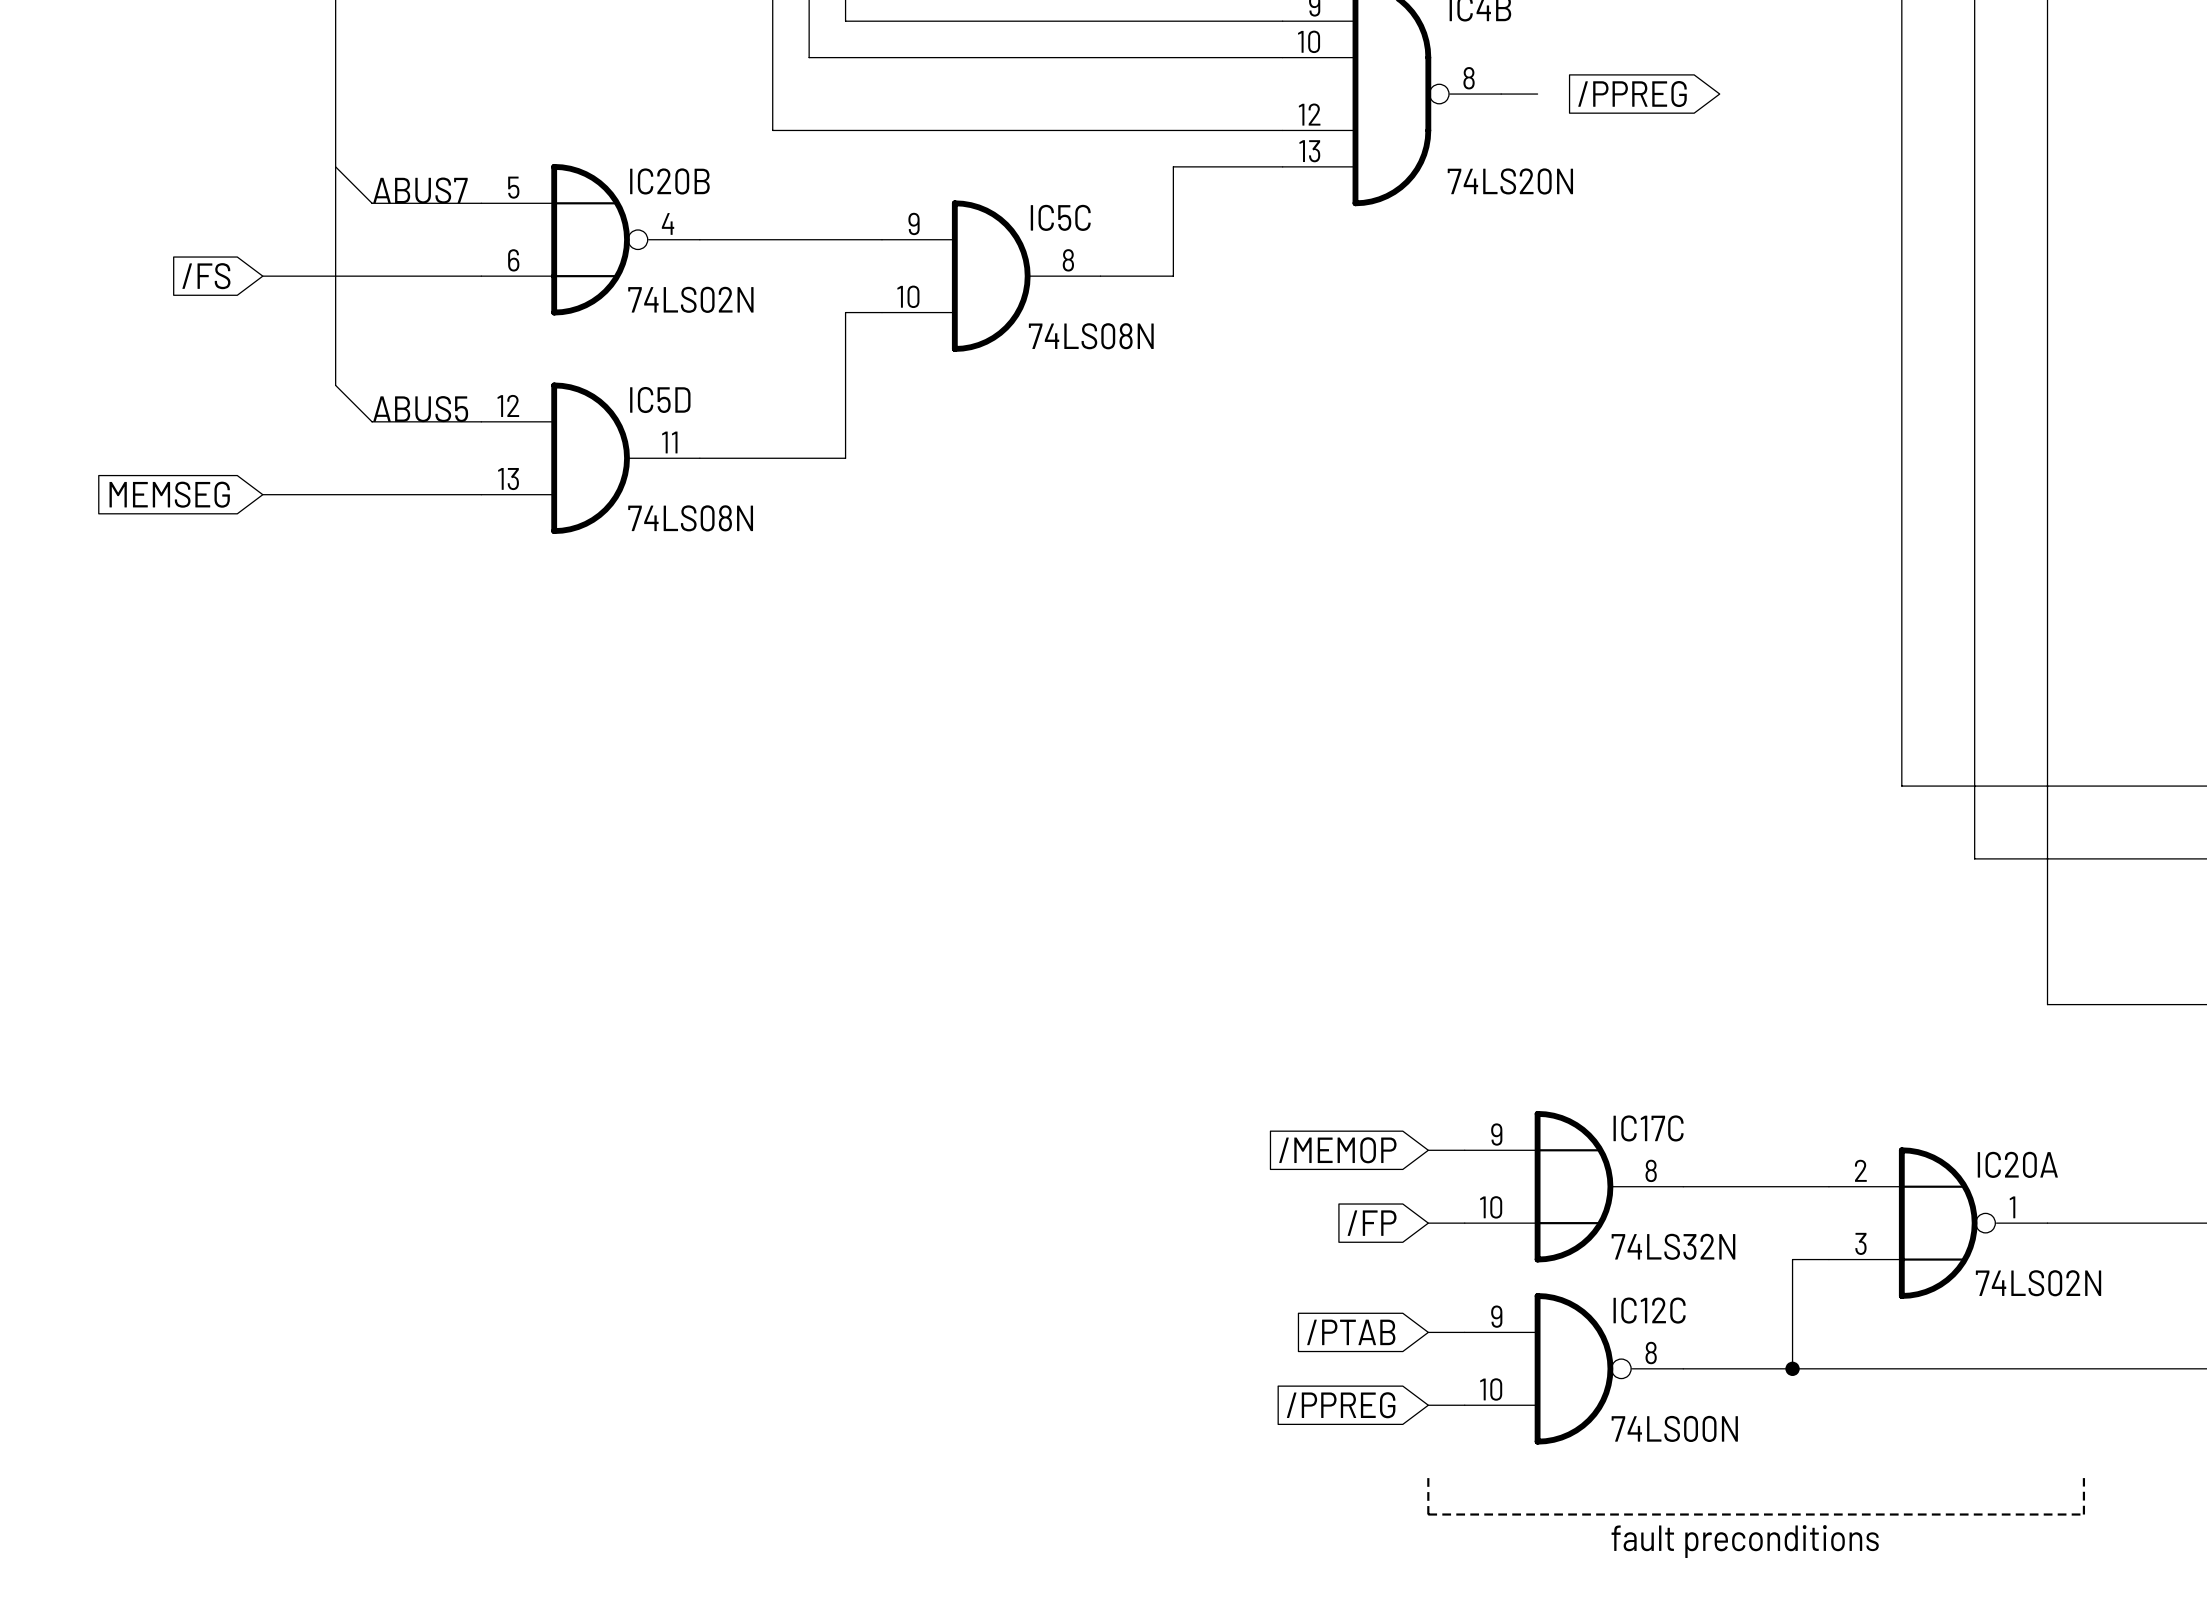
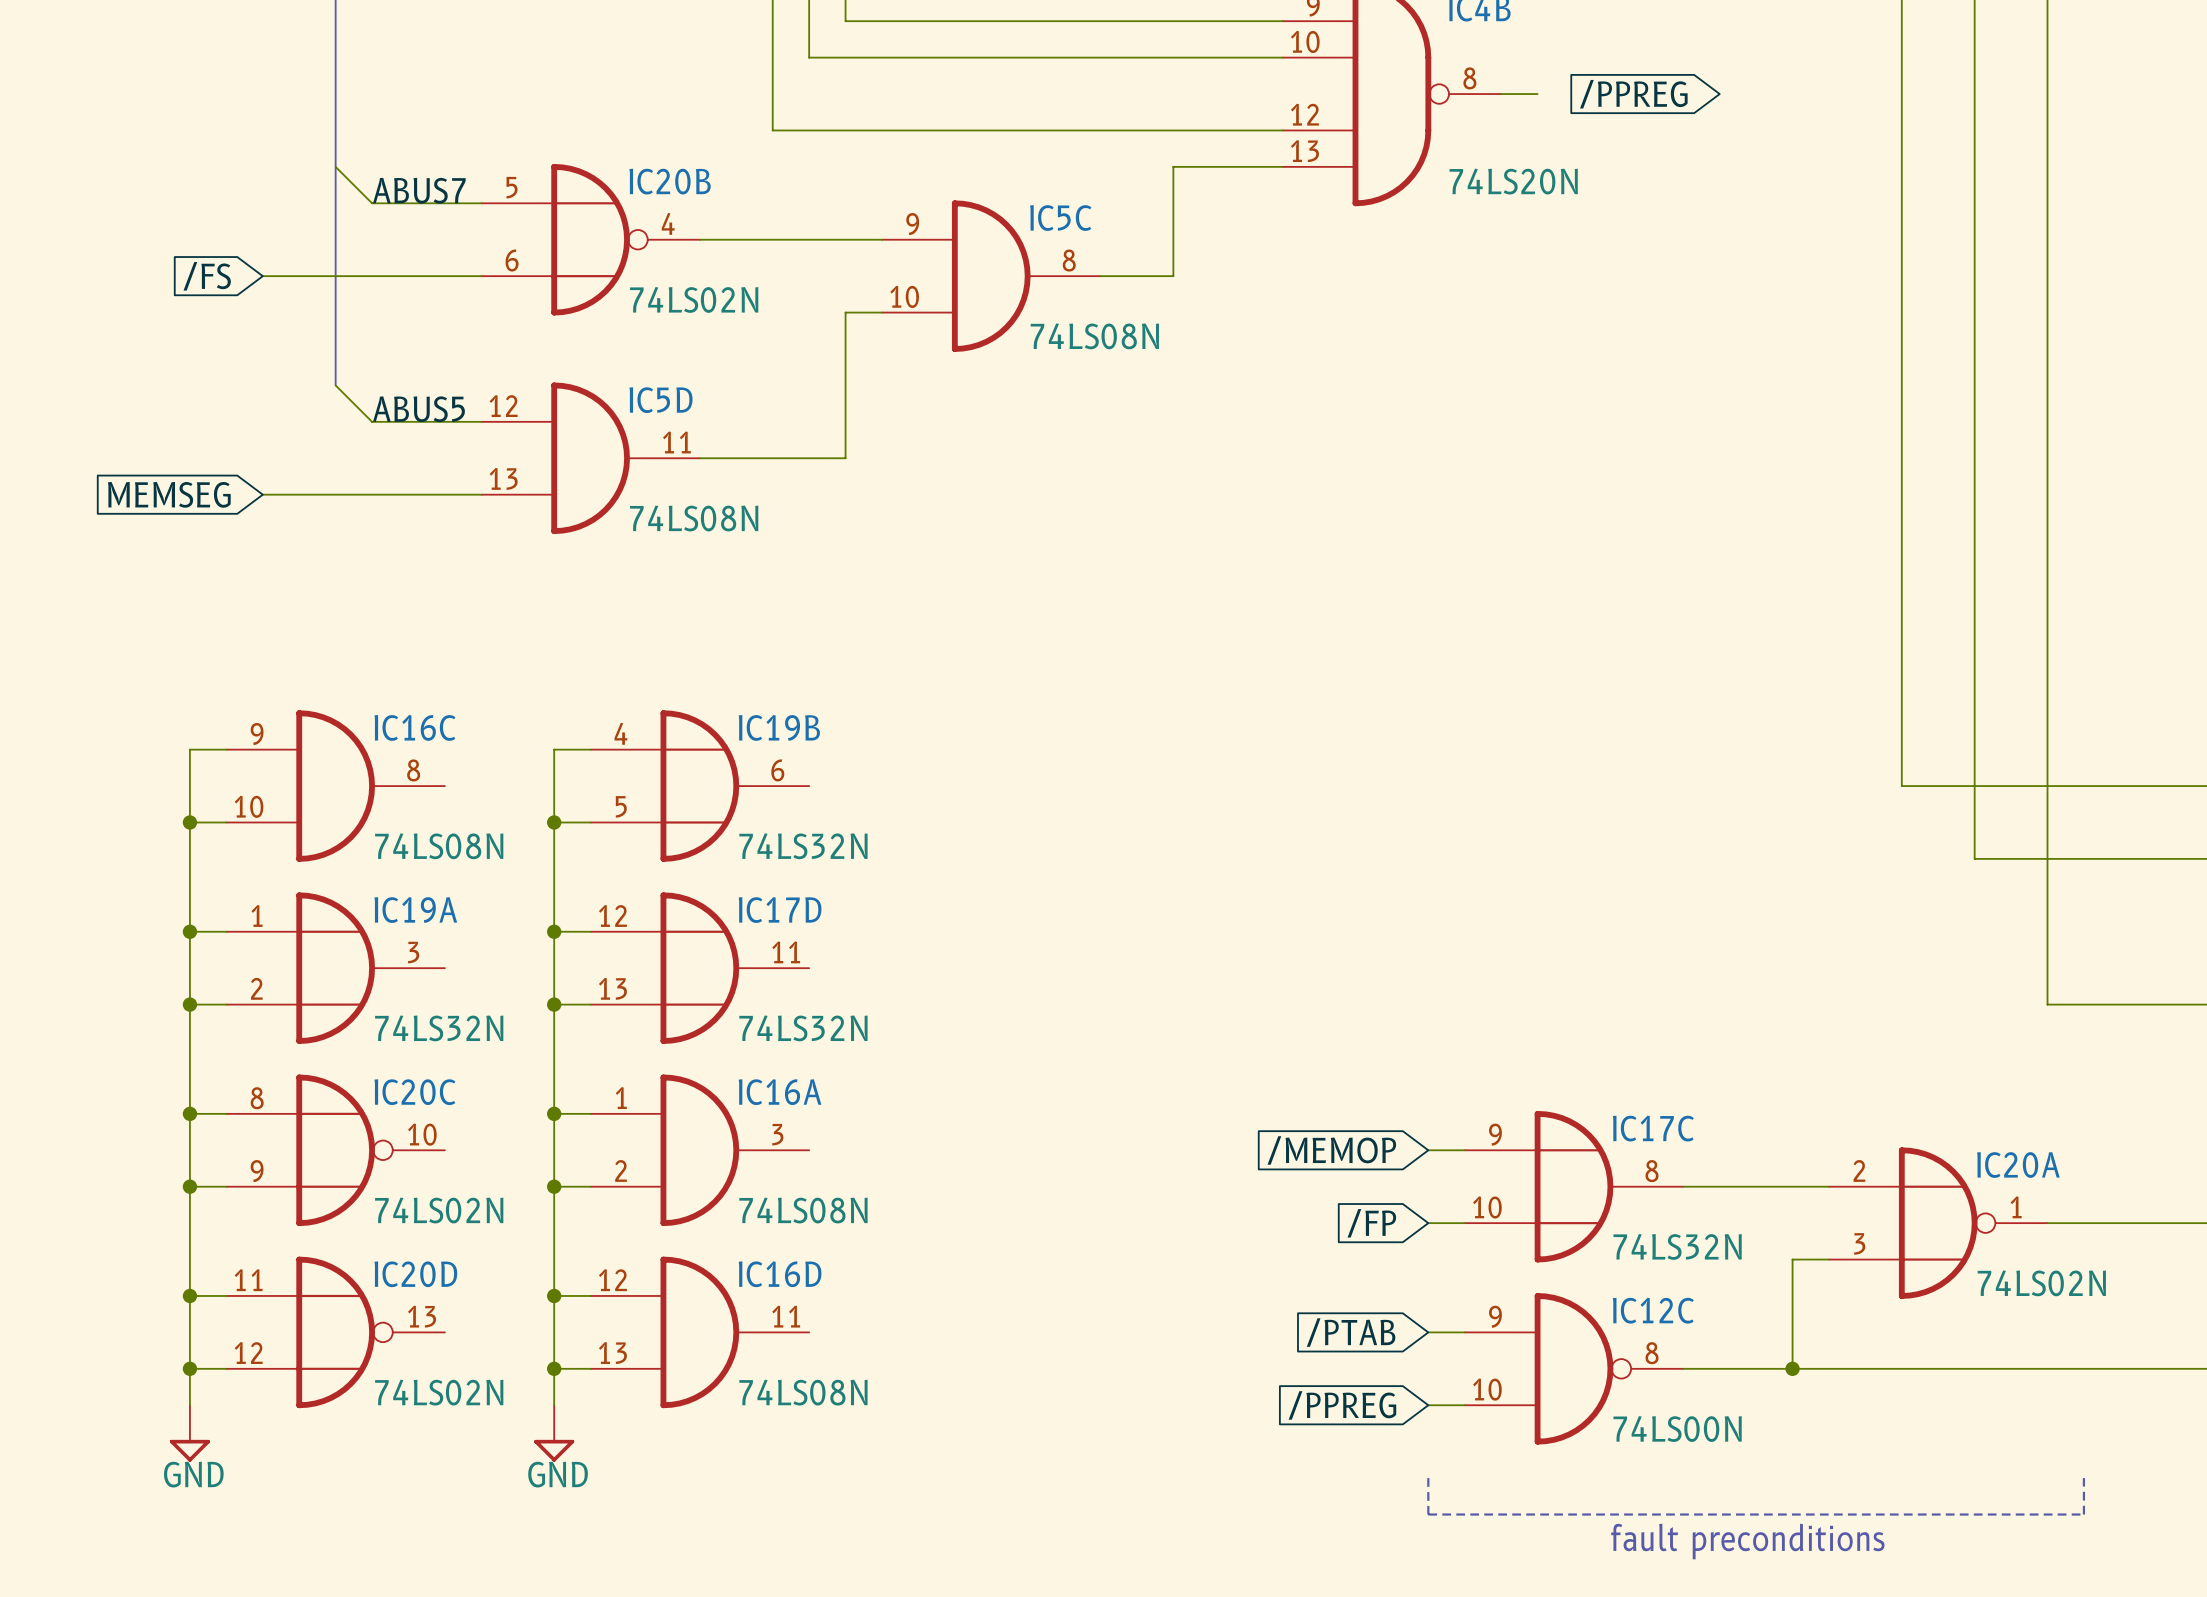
wire: none -> (226, 749) (189, 749) (189, 1405)
wire: none -> (590, 749) (554, 749) (554, 1405)
IC16C: none -> 74LS08N (335, 786)
IC19B: none -> 74LS32N (699, 786)
wire: none -> (189, 822) (226, 822)
junction: none -> (189, 822)
wire: none -> (554, 822) (590, 822)
junction: none -> (554, 822)
wire: none -> (189, 931) (226, 931)
junction: none -> (189, 931)
wire: none -> (554, 931) (590, 931)
junction: none -> (554, 931)
IC19A: none -> 74LS32N (335, 968)
IC17D: none -> 74LS32N (699, 968)
wire: none -> (189, 1004) (226, 1004)
junction: none -> (189, 1004)
wire: none -> (554, 1004) (590, 1004)
junction: none -> (554, 1004)
wire: none -> (189, 1113) (226, 1113)
junction: none -> (189, 1113)
wire: none -> (554, 1113) (590, 1113)
junction: none -> (554, 1113)
IC20C: none -> 74LS02N (335, 1150)
IC16A: none -> 74LS08N (699, 1150)
wire: none -> (189, 1186) (226, 1186)
junction: none -> (189, 1186)
wire: none -> (554, 1186) (590, 1186)
junction: none -> (554, 1186)
wire: none -> (189, 1295) (226, 1295)
junction: none -> (189, 1295)
wire: none -> (554, 1295) (590, 1295)
junction: none -> (554, 1295)
IC20D: none -> 74LS02N (335, 1332)
IC16D: none -> 74LS08N (699, 1332)
wire: none -> (189, 1368) (226, 1368)
junction: none -> (189, 1368)
wire: none -> (554, 1368) (590, 1368)
junction: none -> (554, 1368)
power symbol: none -> GND (189, 1433)
power symbol: none -> GND (554, 1433)

